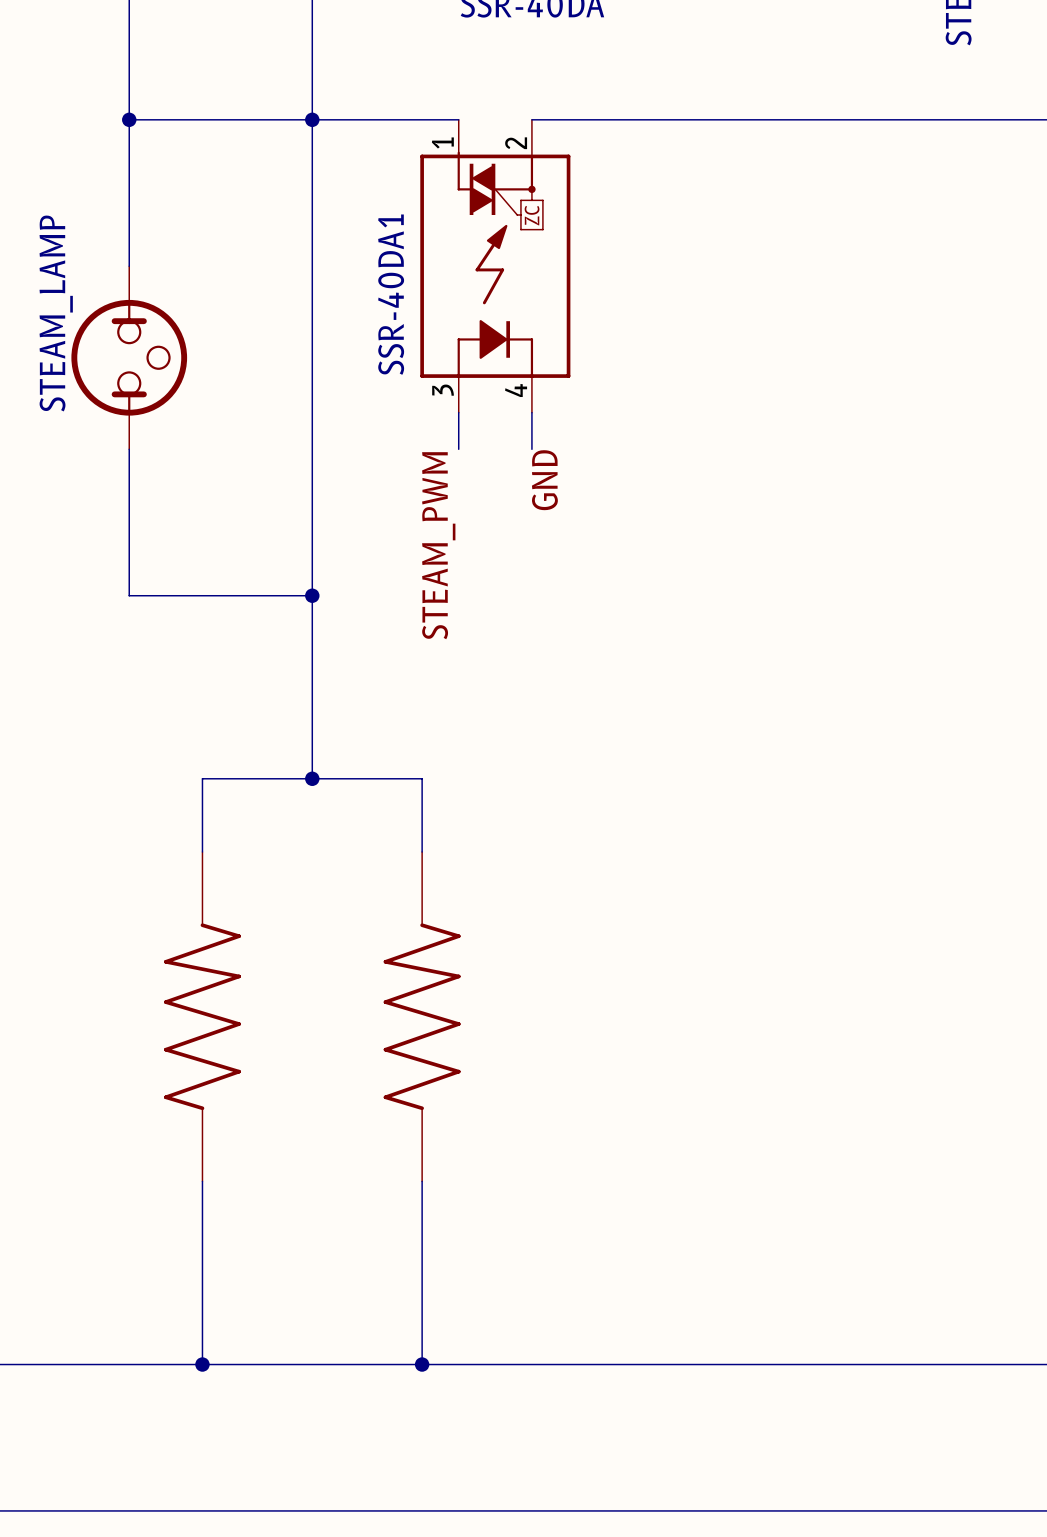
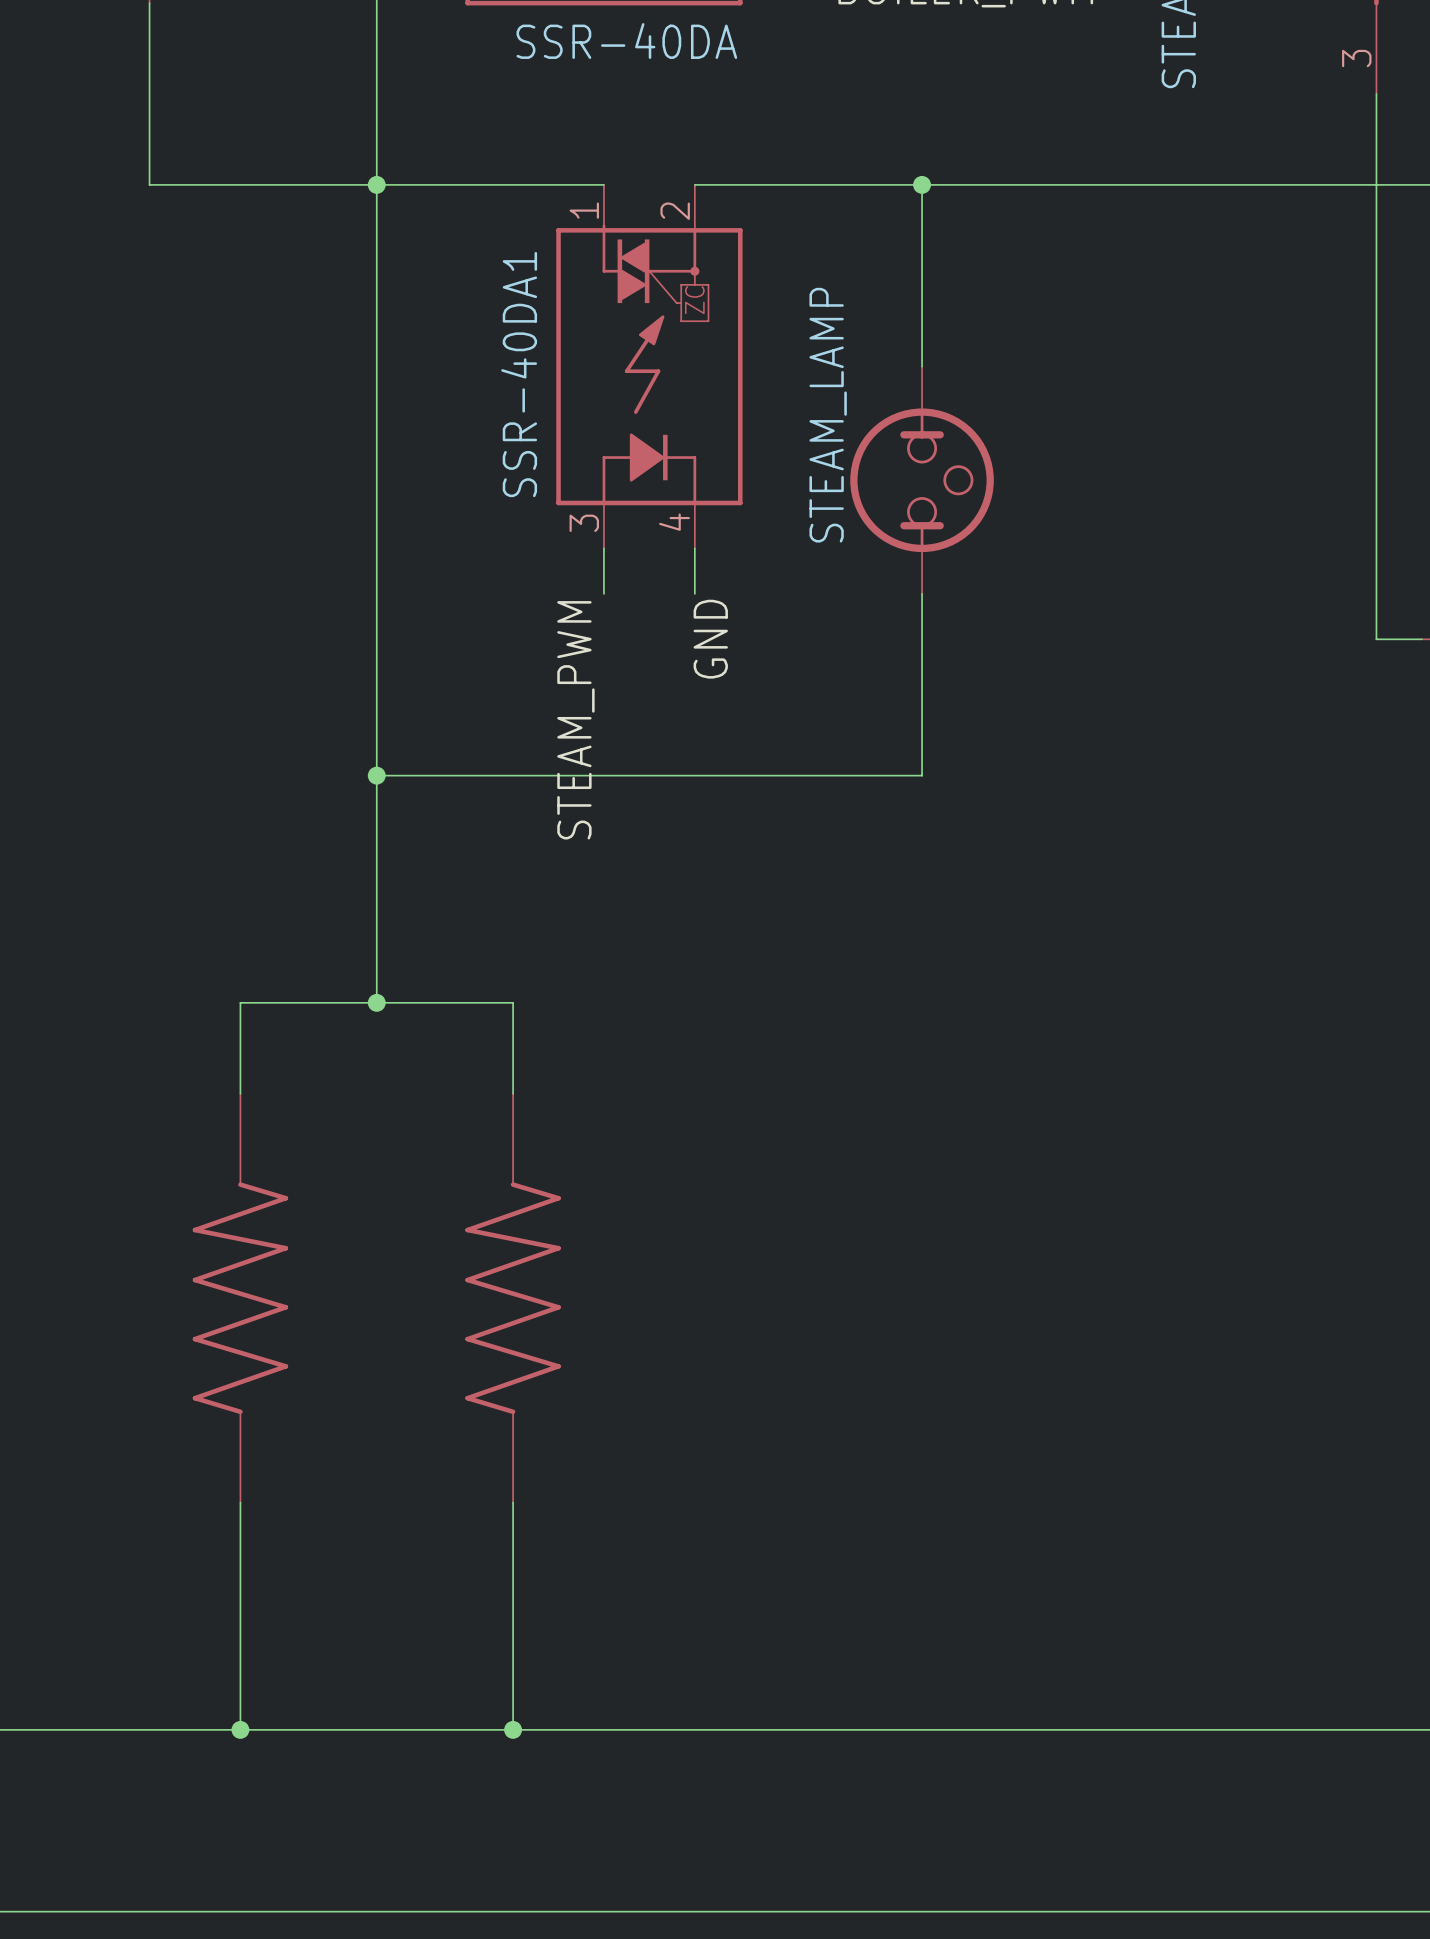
wire: (129, 119) (129, 266) -> none
junction: (129, 119) -> none
wire: (531, 119) (568, 119) -> (558, 184) (603, 184)
wire: none -> (922, 184) (922, 366)
junction: none -> (922, 184)
SSR-40DA1 position: (495, 266) -> (649, 366)
STEAM_LAMP: (129, 357) -> none
STEAM_LAMP: none -> (922, 480)
wire: (458, 412) (458, 449) -> (603, 548) (603, 593)
wire: (531, 412) (531, 449) -> (694, 548) (694, 593)
wire: (129, 449) (129, 595) (312, 595) -> (922, 593) (922, 775) (376, 775)
label position: GND (544, 480) -> GND (710, 639)
label position: STEAM_PWM (438, 545) -> STEAM_PWM (575, 720)

